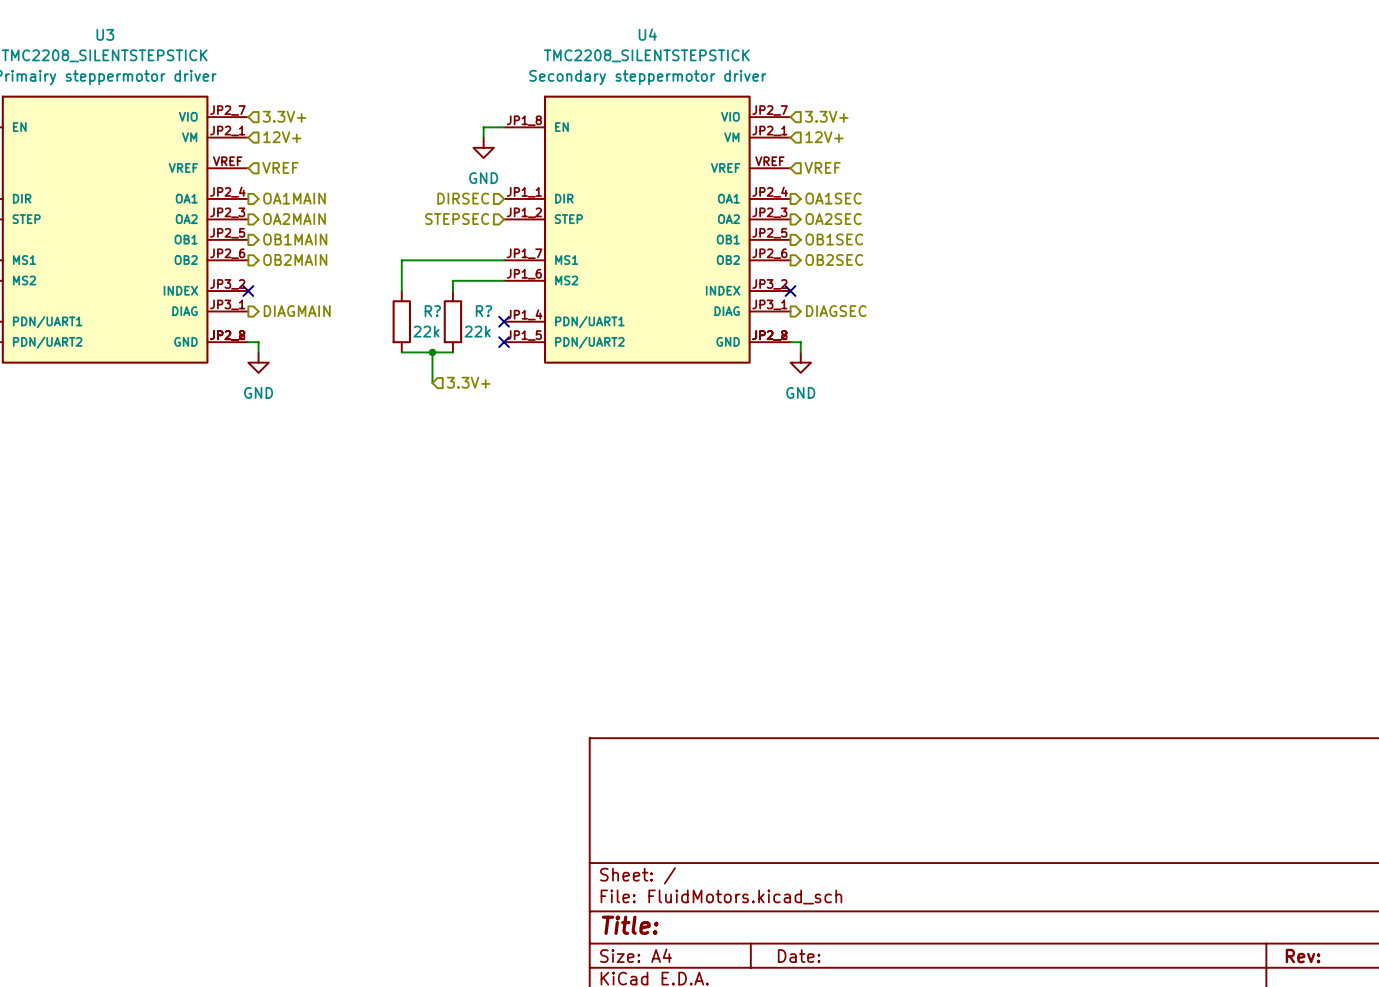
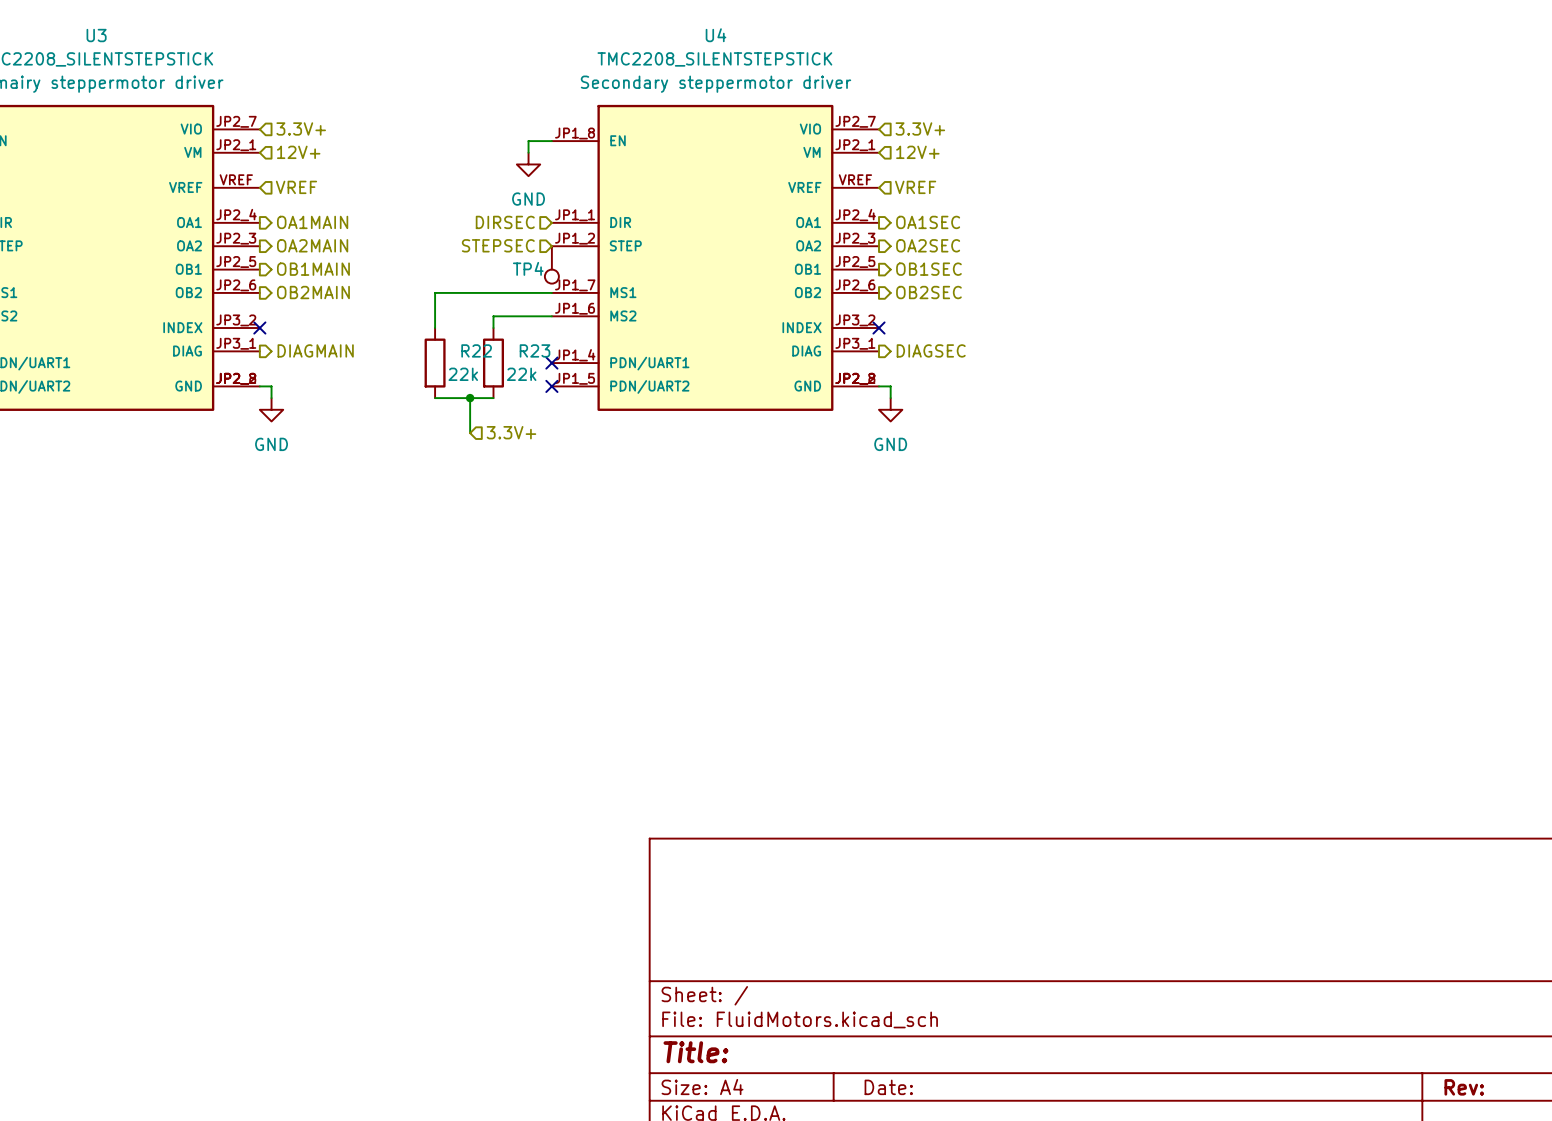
TP4: none -> (551, 264)
R? name: R? (432, 311) -> R22 (476, 350)
R? name: R? (483, 311) -> R23 (535, 350)

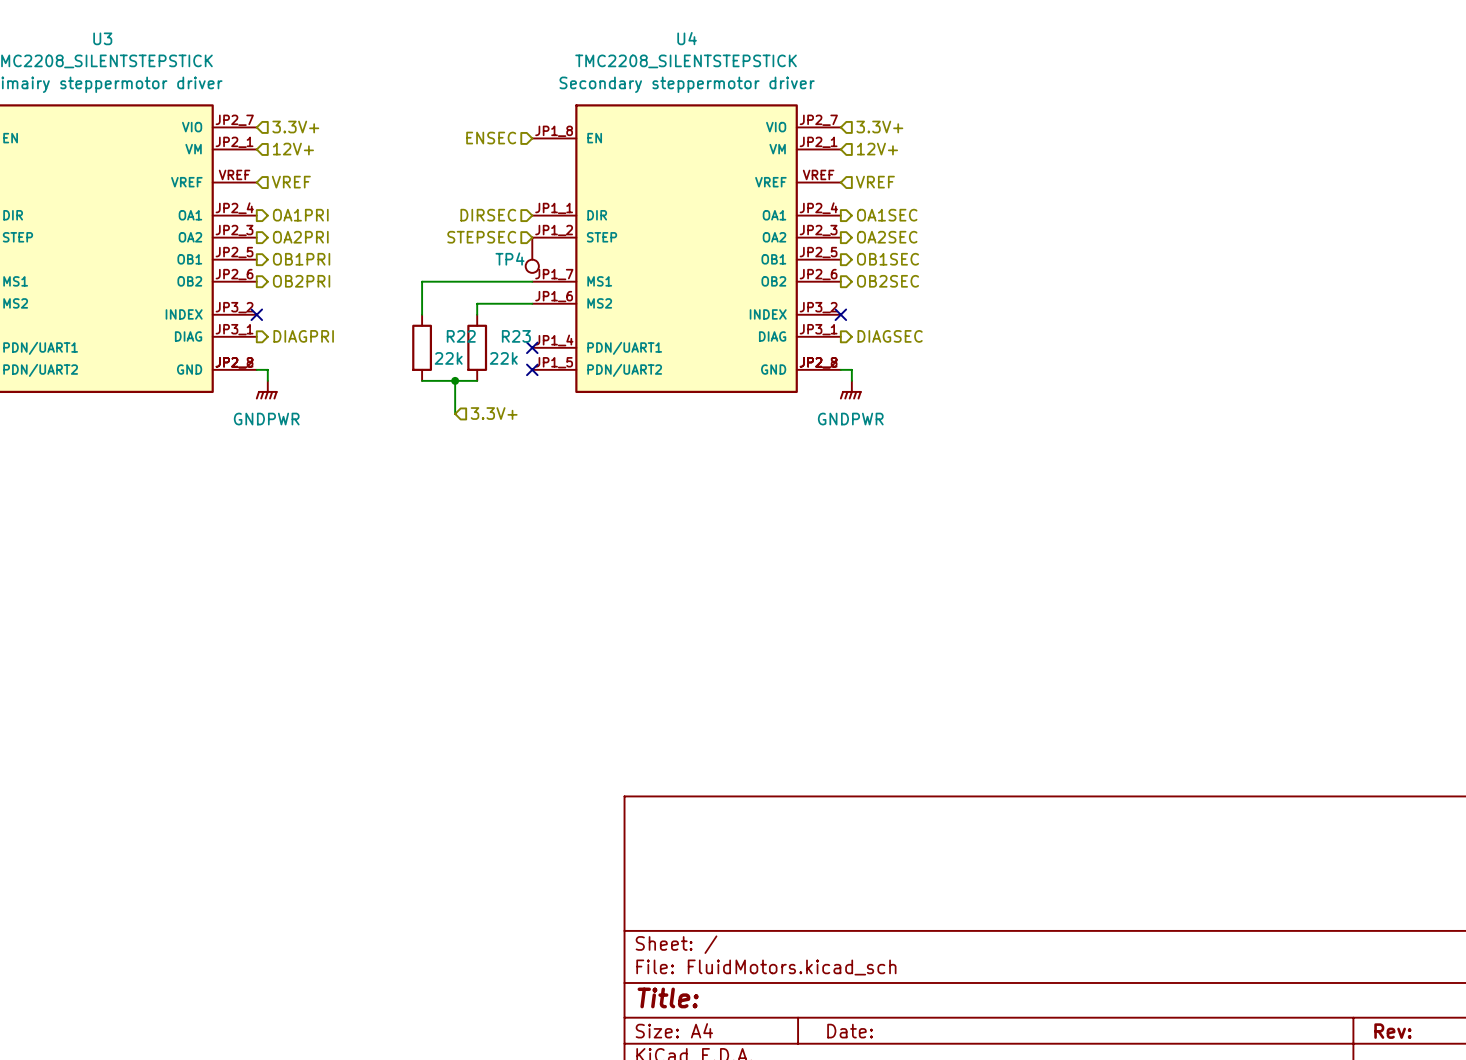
hierarchical label: none -> ENSEC (491, 138)
wire: (551, 141) (528, 141) (528, 152) -> none
power symbol: GND (528, 164) -> none
hierarchical label: OA1MAIN (312, 222) -> OA1PRI (300, 215)
hierarchical label: OA2MAIN (312, 245) -> OA2PRI (300, 237)
hierarchical label: OB1MAIN (313, 269) -> OB1PRI (301, 259)
hierarchical label: OB2MAIN (313, 292) -> OB2PRI (301, 281)
hierarchical label: DIAGMAIN (315, 350) -> DIAGPRI (303, 336)
power symbol: GND (271, 409) -> GNDPWR (266, 390)
power symbol: GND (890, 409) -> GNDPWR (850, 390)

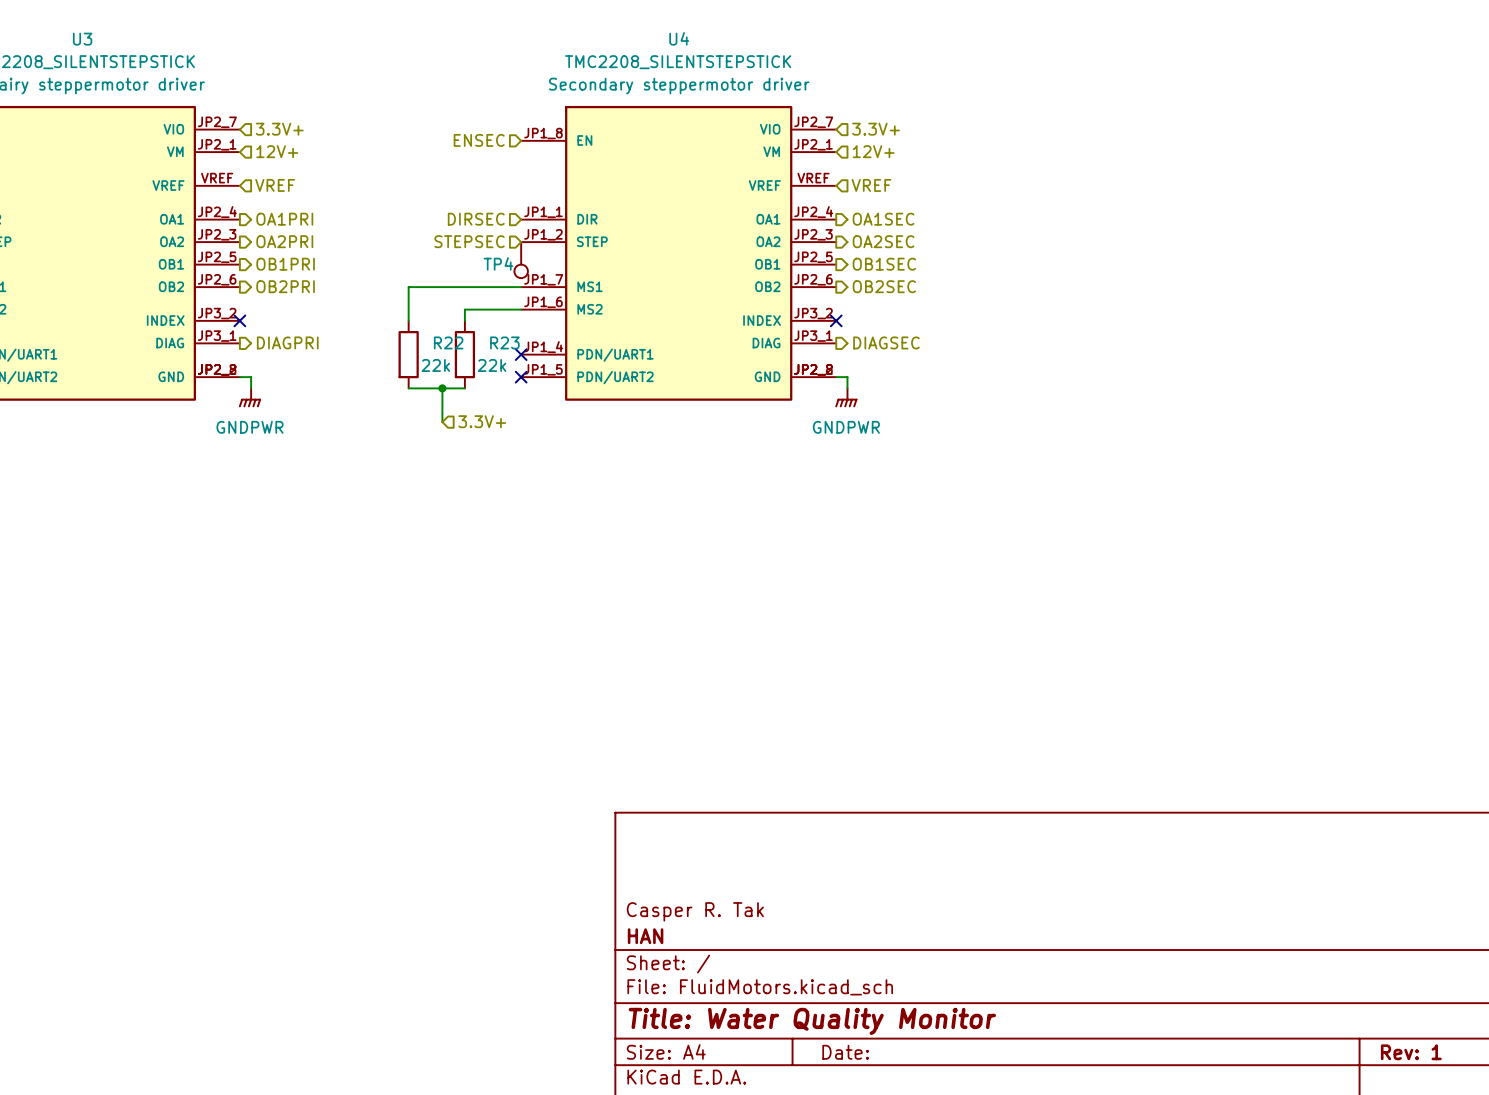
title block: none -> Casper R. Tak (695, 911)
title block: none -> HAN (645, 936)
title block: Title: (668, 997) -> Title: Water Quality Monitor (812, 1021)
title block: Rev: (1392, 1031) -> Rev: 1 (1411, 1052)

